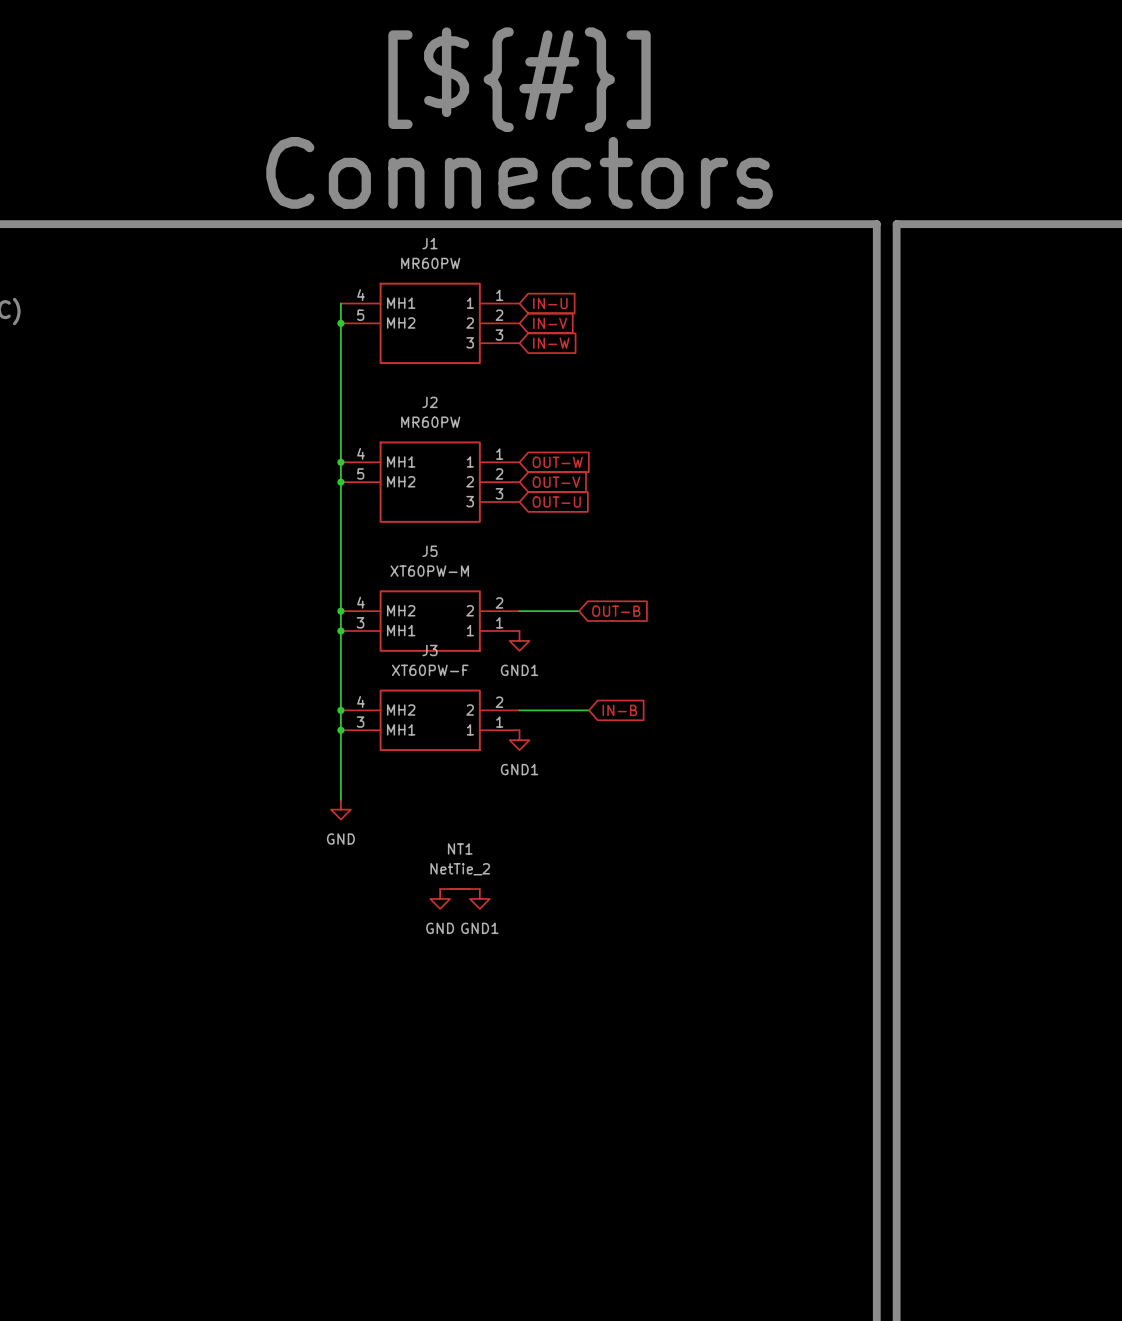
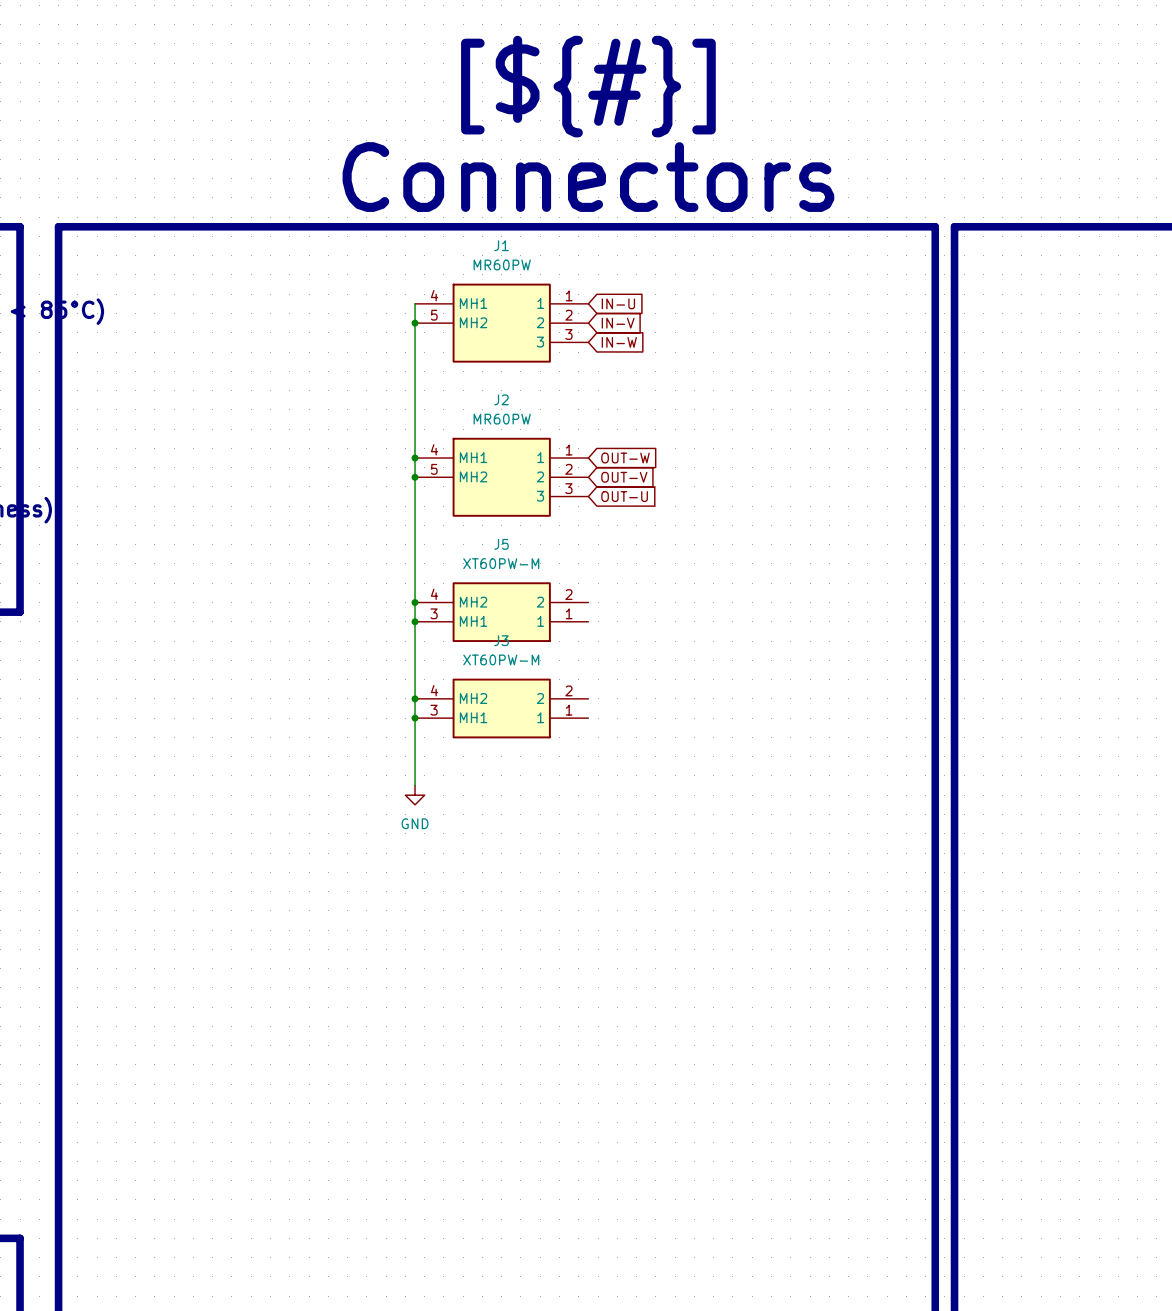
wire: (519, 611) (579, 611) -> none
global label: OUT-B (616, 611) -> none
power symbol: GND1 (519, 640) -> none
J3 value: XT60PW-F (430, 670) -> XT60PW-M (501, 659)
wire: (519, 710) (589, 710) -> none
global label: IN-B (619, 710) -> none
power symbol: GND1 (519, 740) -> none
NT1: NetTie_2 (459, 889) -> none
power symbol: GND (440, 898) -> none
power symbol: GND1 (479, 898) -> none

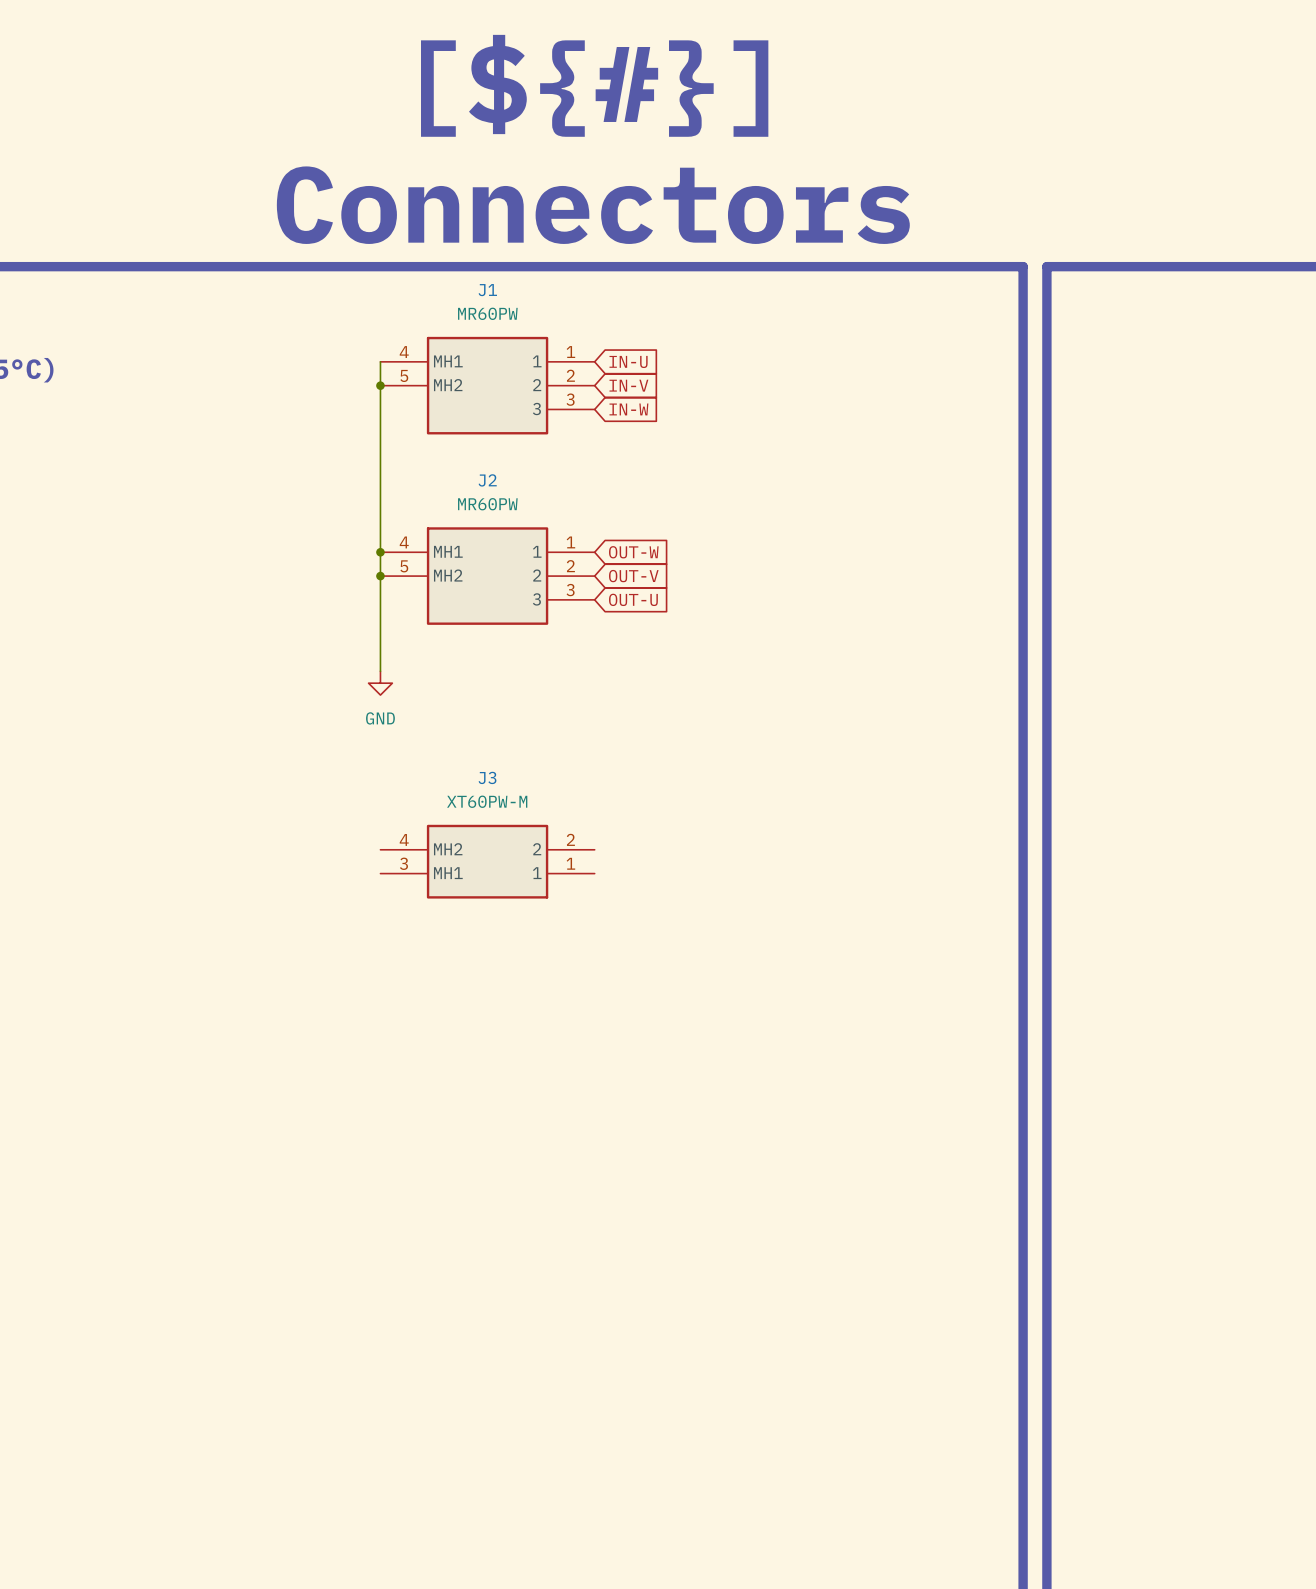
wire: (415, 554) (415, 785) -> none
power symbol: none -> GND (380, 683)
junction: (415, 602) -> none
J5: XT60PW-M (501, 612) -> none
junction: (415, 621) -> none
junction: (415, 698) -> none
junction: (415, 718) -> none
power symbol: GND (415, 795) -> none

